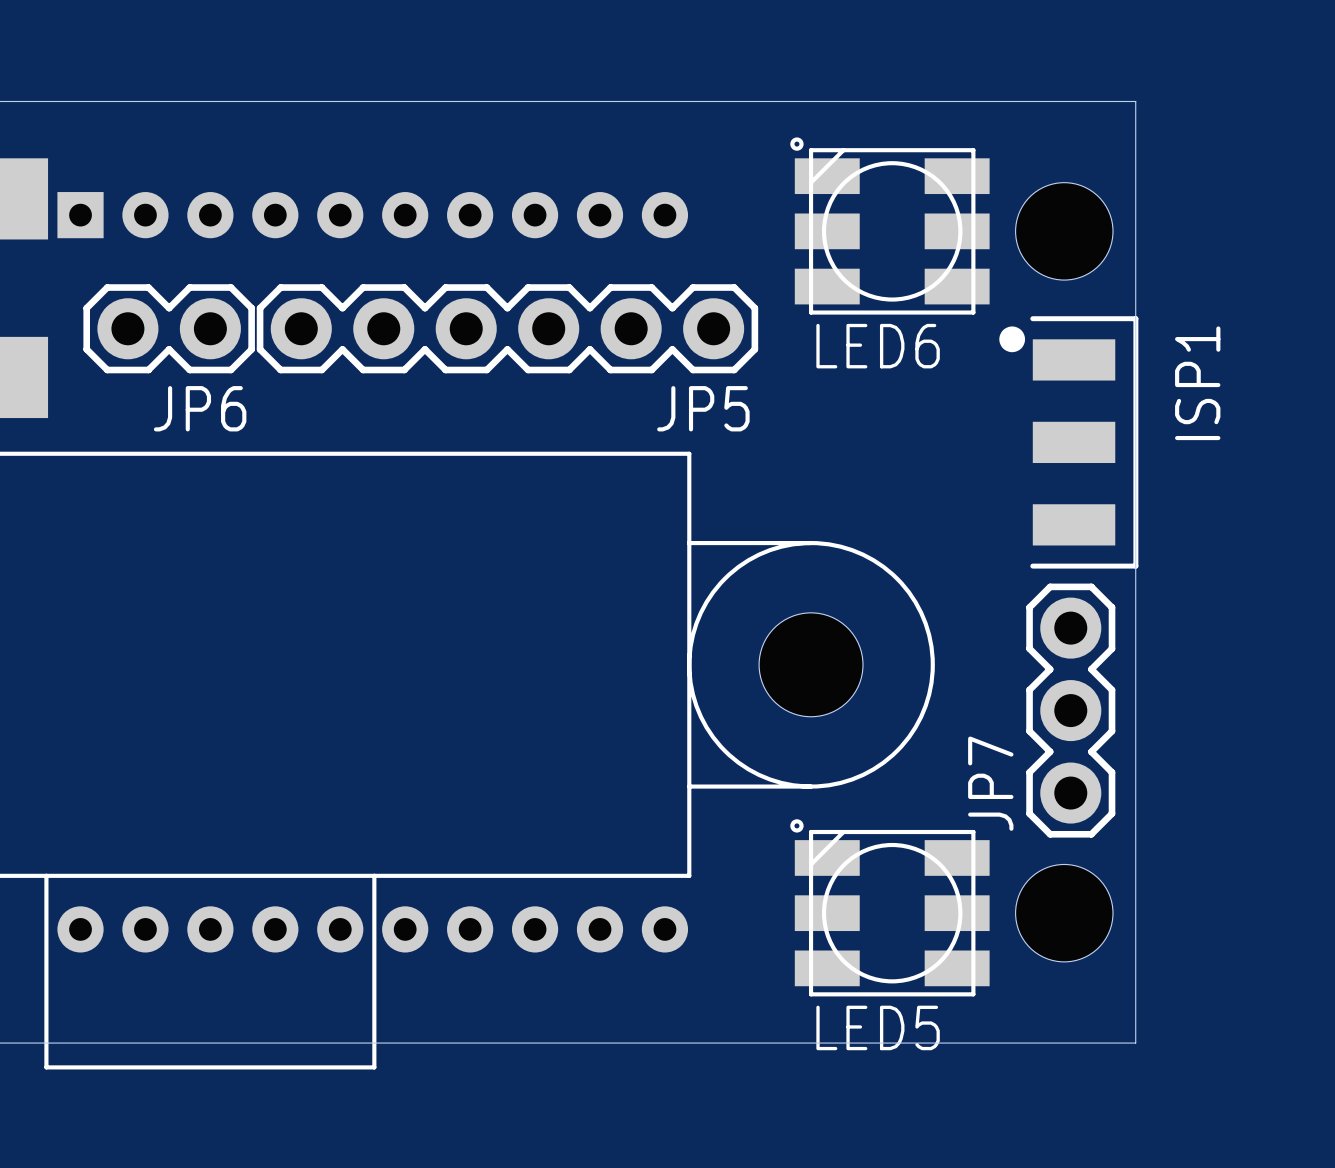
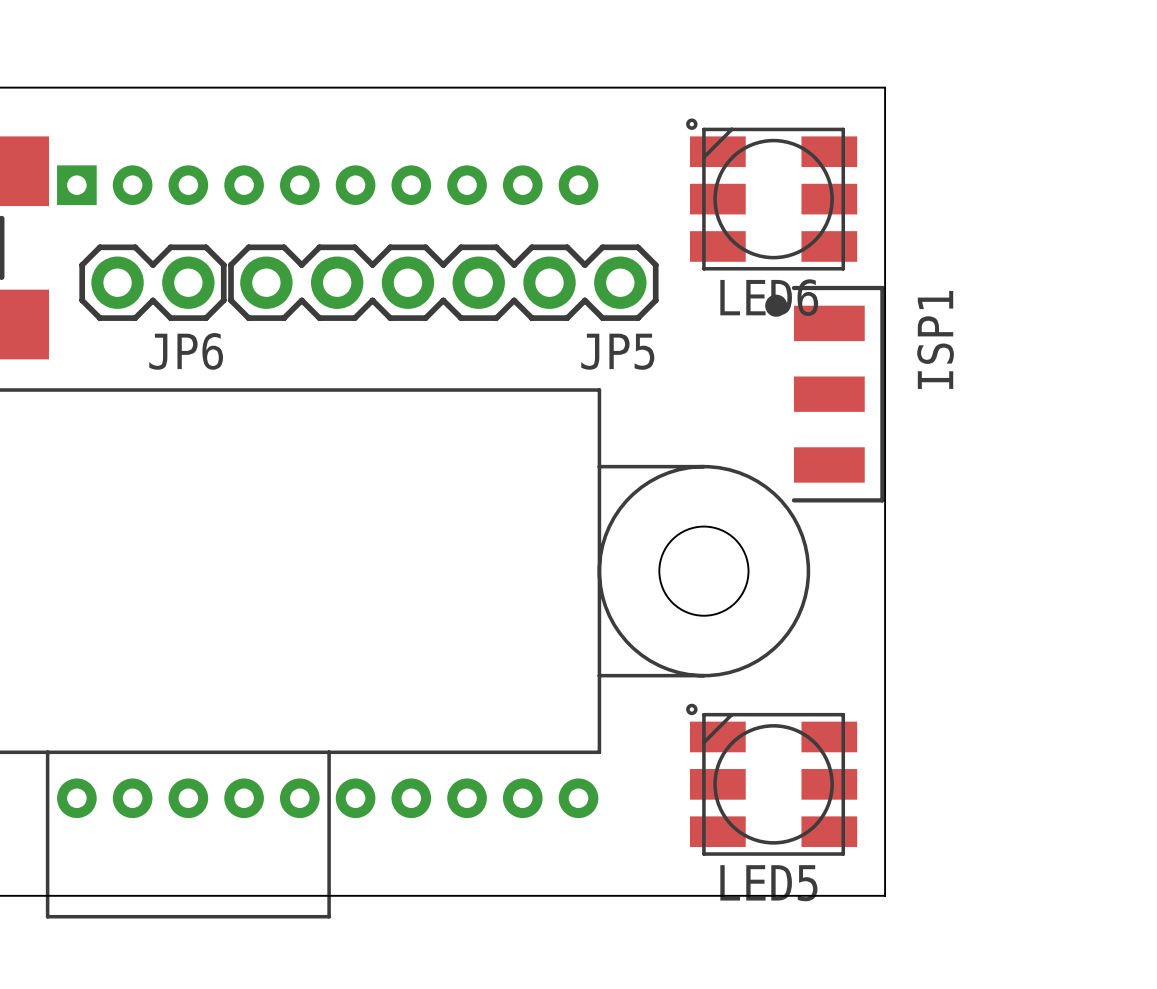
board edge: (1022, 101) (1135, 101) (1135, 1043) (1022, 1043) -> (885, 87) (885, 895)
hole: (1064, 231) -> none
ISP1 position: (1068, 442) -> (824, 394)
JP7: (1070, 710) -> none
hole: (1064, 913) -> none

